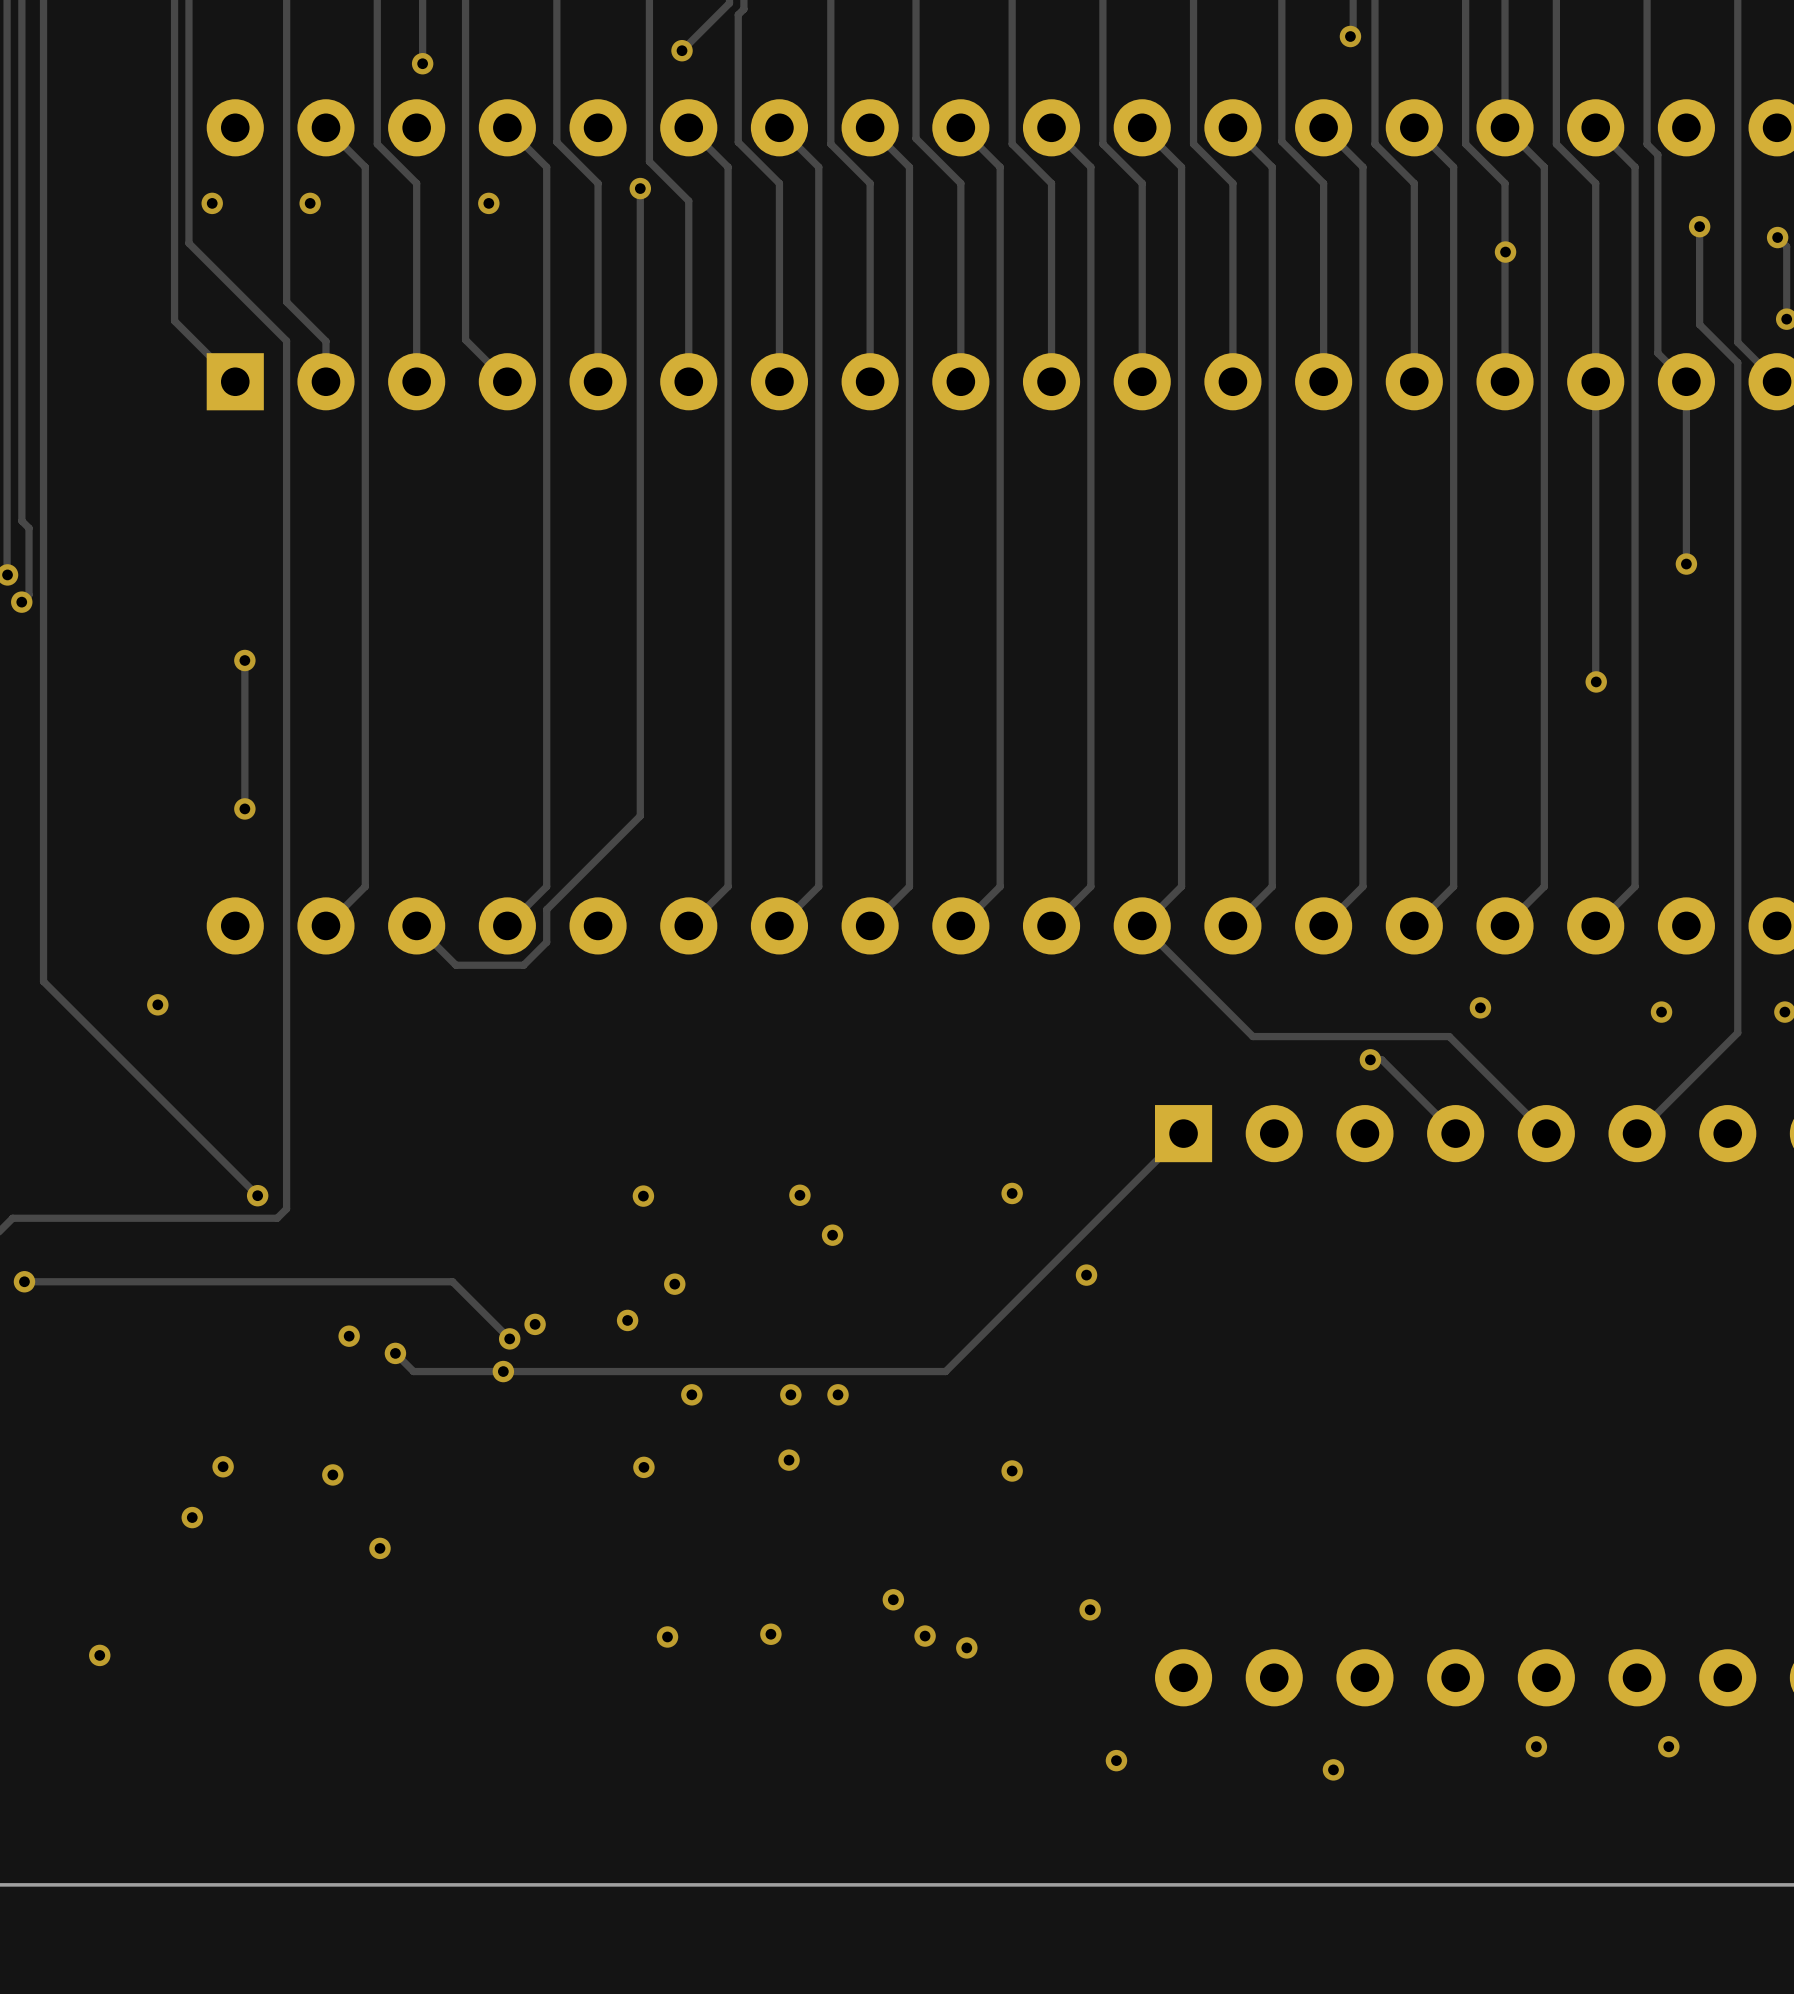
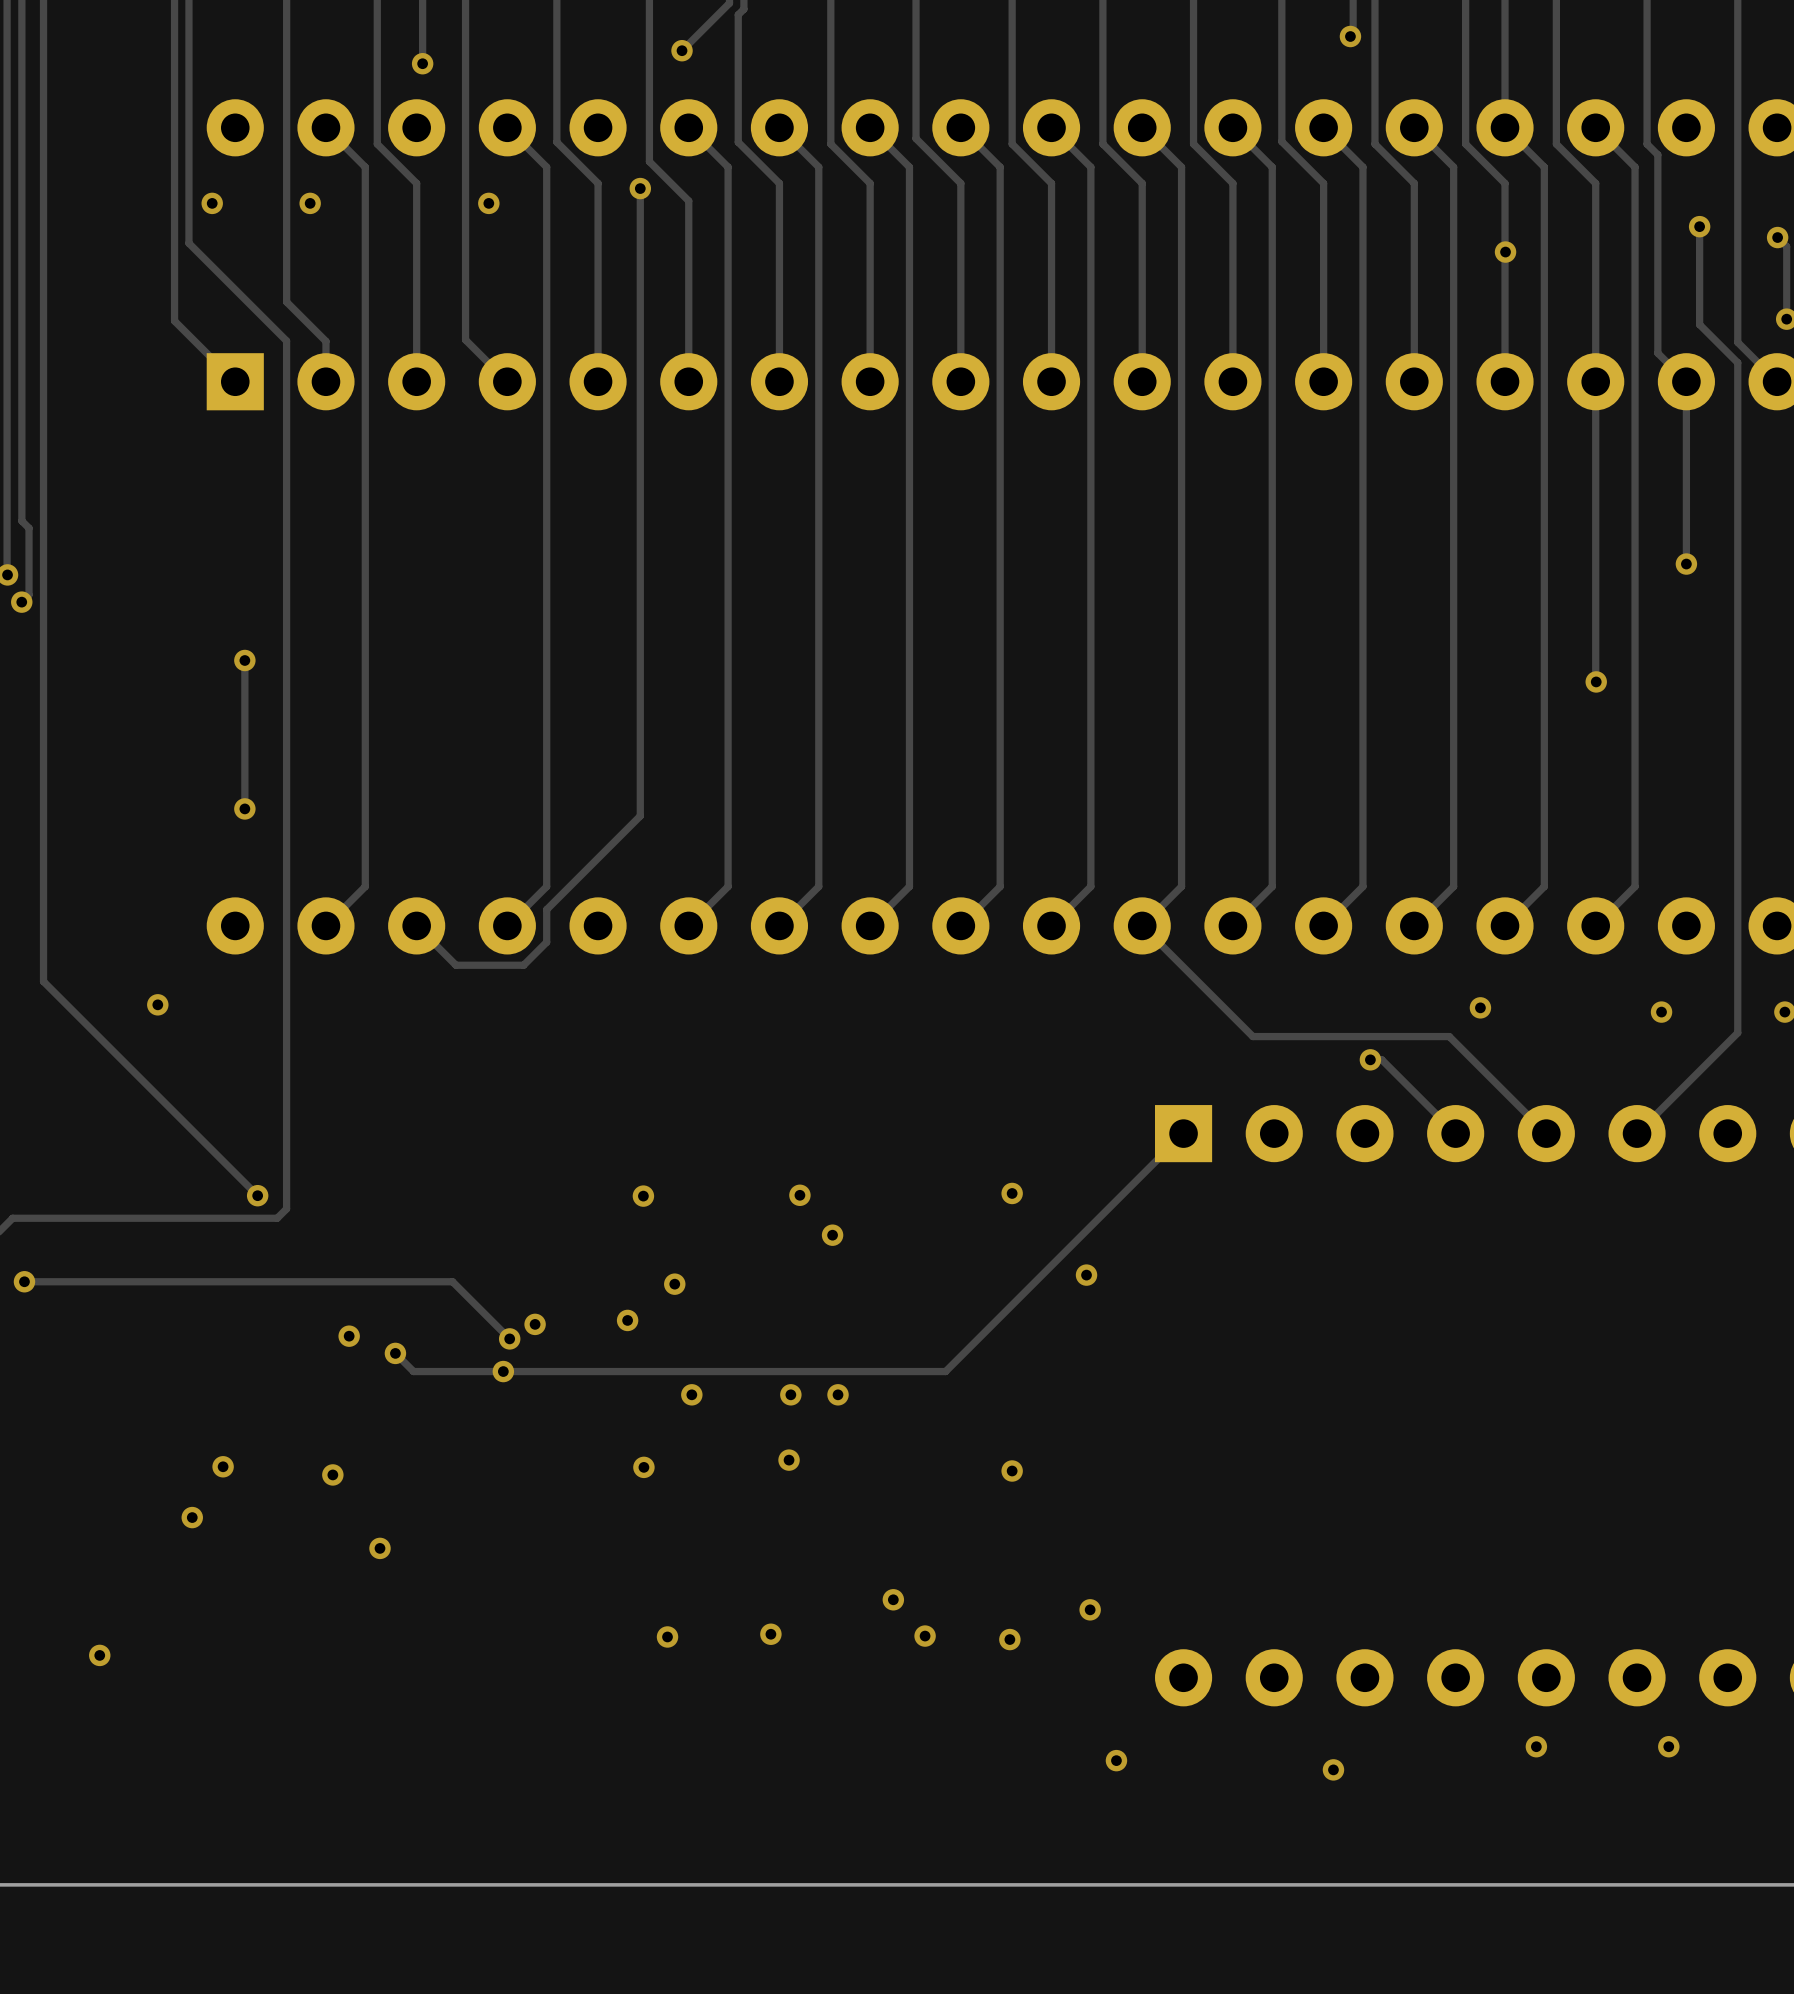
via position: (966, 1647) -> (1009, 1639)

